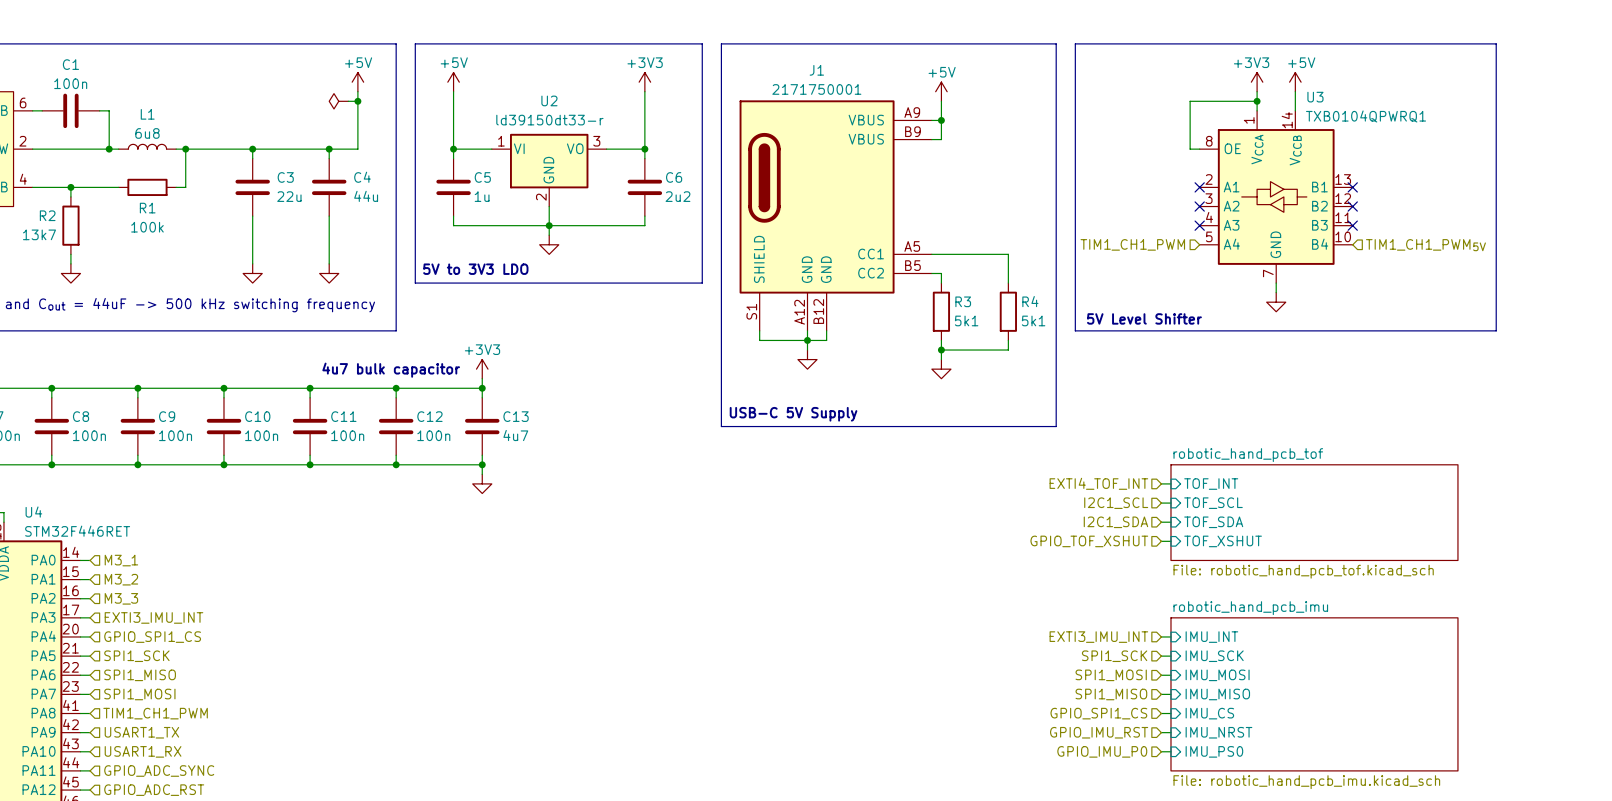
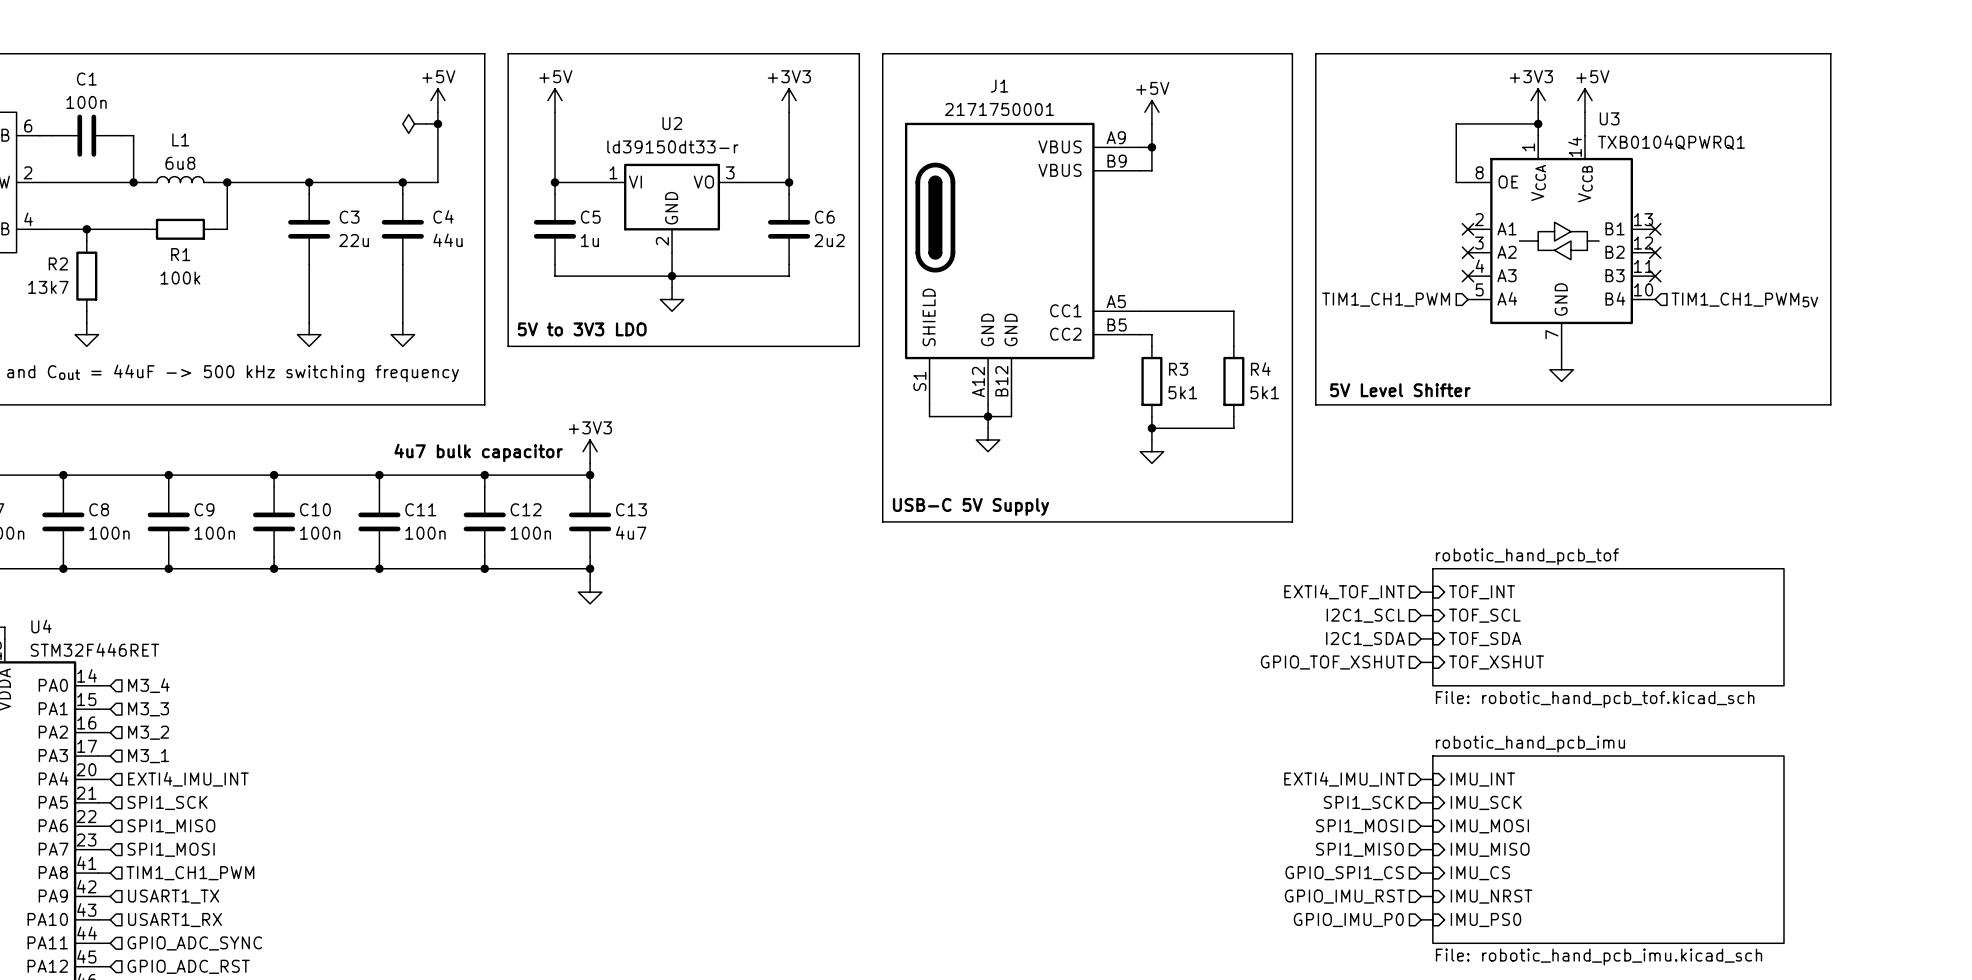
hierarchical label: M3_1 (121, 560) -> M3_4 (148, 685)
hierarchical label: M3_2 (121, 579) -> M3_3 (148, 709)
hierarchical label: M3_3 (121, 598) -> M3_2 (148, 732)
hierarchical label: EXTI3_IMU_INT (153, 617) -> M3_1 (148, 756)
hierarchical label: GPIO_SPI1_CS (152, 637) -> EXTI4_IMU_INT (188, 779)
hierarchical label: EXTI3_IMU_INT (1098, 637) -> EXTI4_IMU_INT (1344, 779)

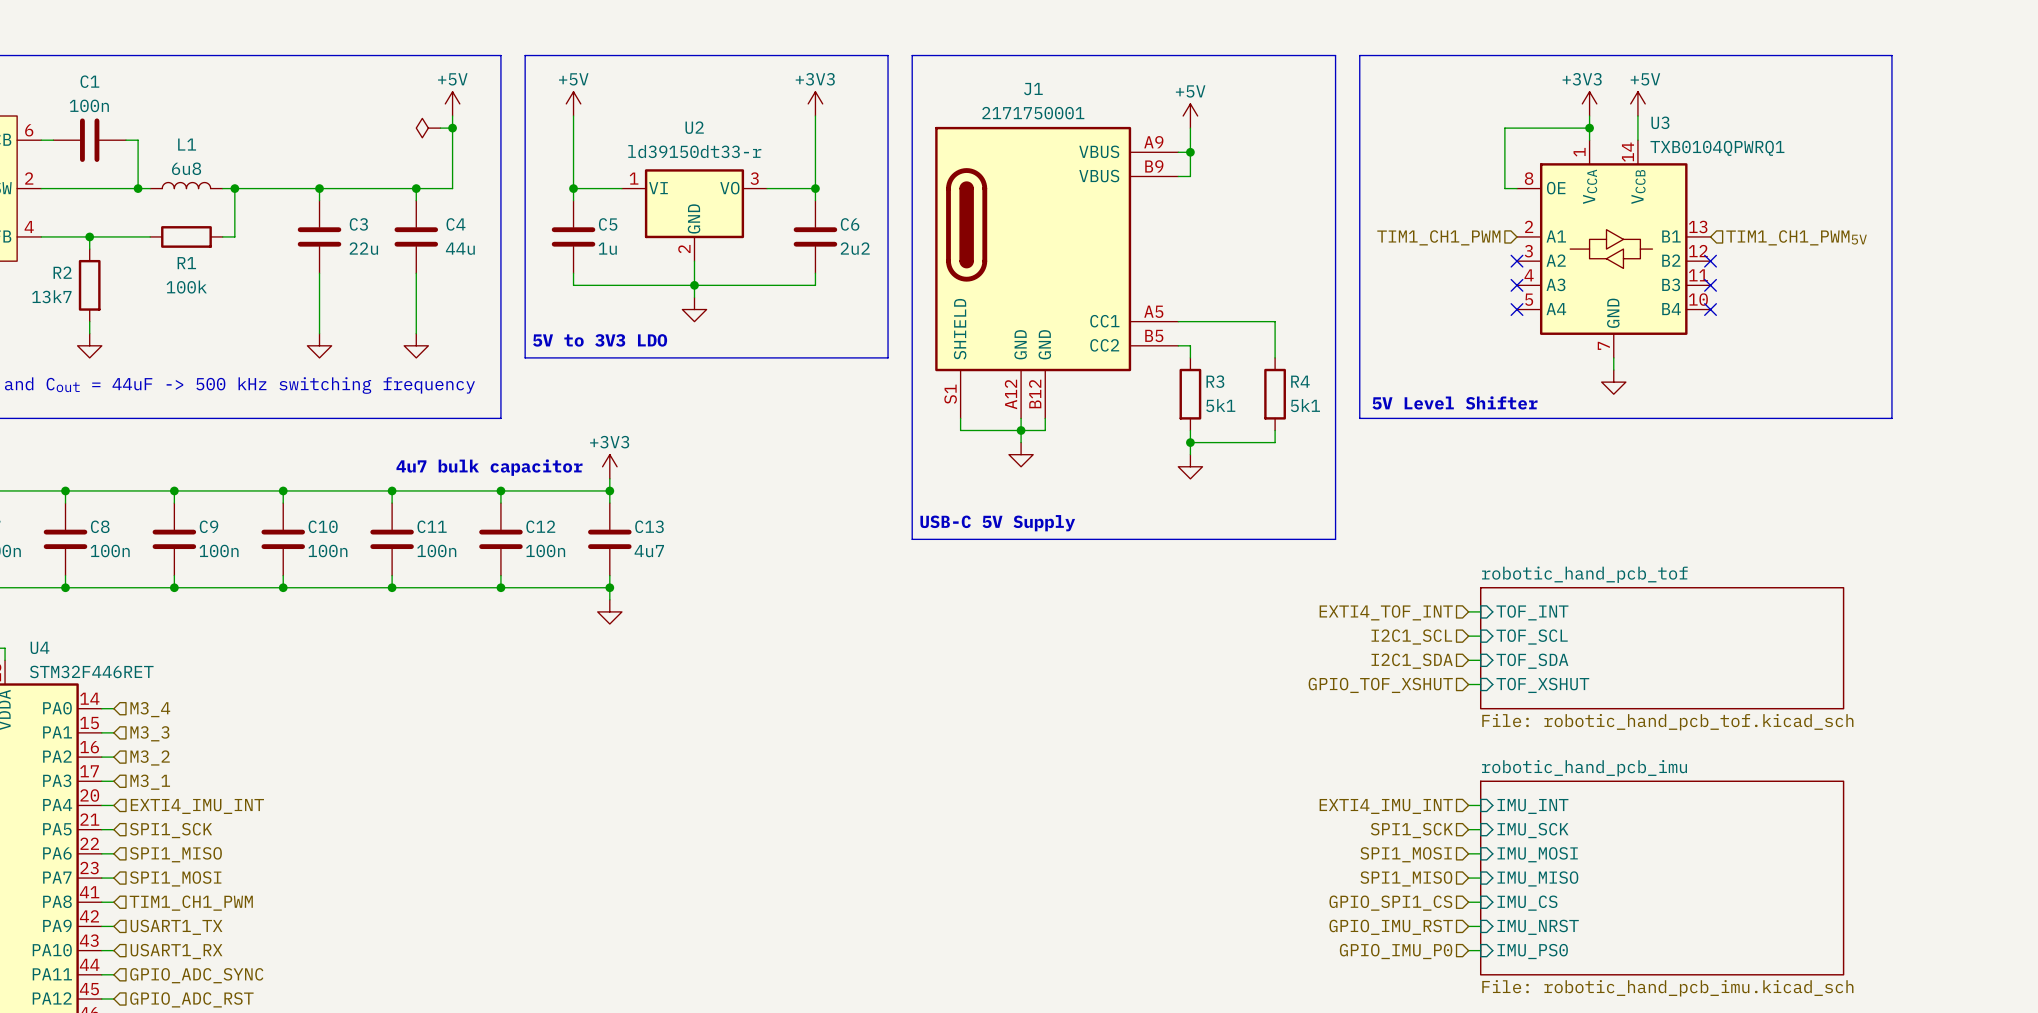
no-connect mark: (1467, 229) -> none
no-connect mark: (1655, 229) -> none
hierarchical label position: TIM1_CH1_PWM (1386, 299) -> TIM1_CH1_PWM (1438, 237)
no-connect mark: none -> (1517, 309)
no-connect mark: none -> (1710, 309)
hierarchical label position: TIM1_CH1_PWM5V (1744, 299) -> TIM1_CH1_PWM5V (1796, 237)

